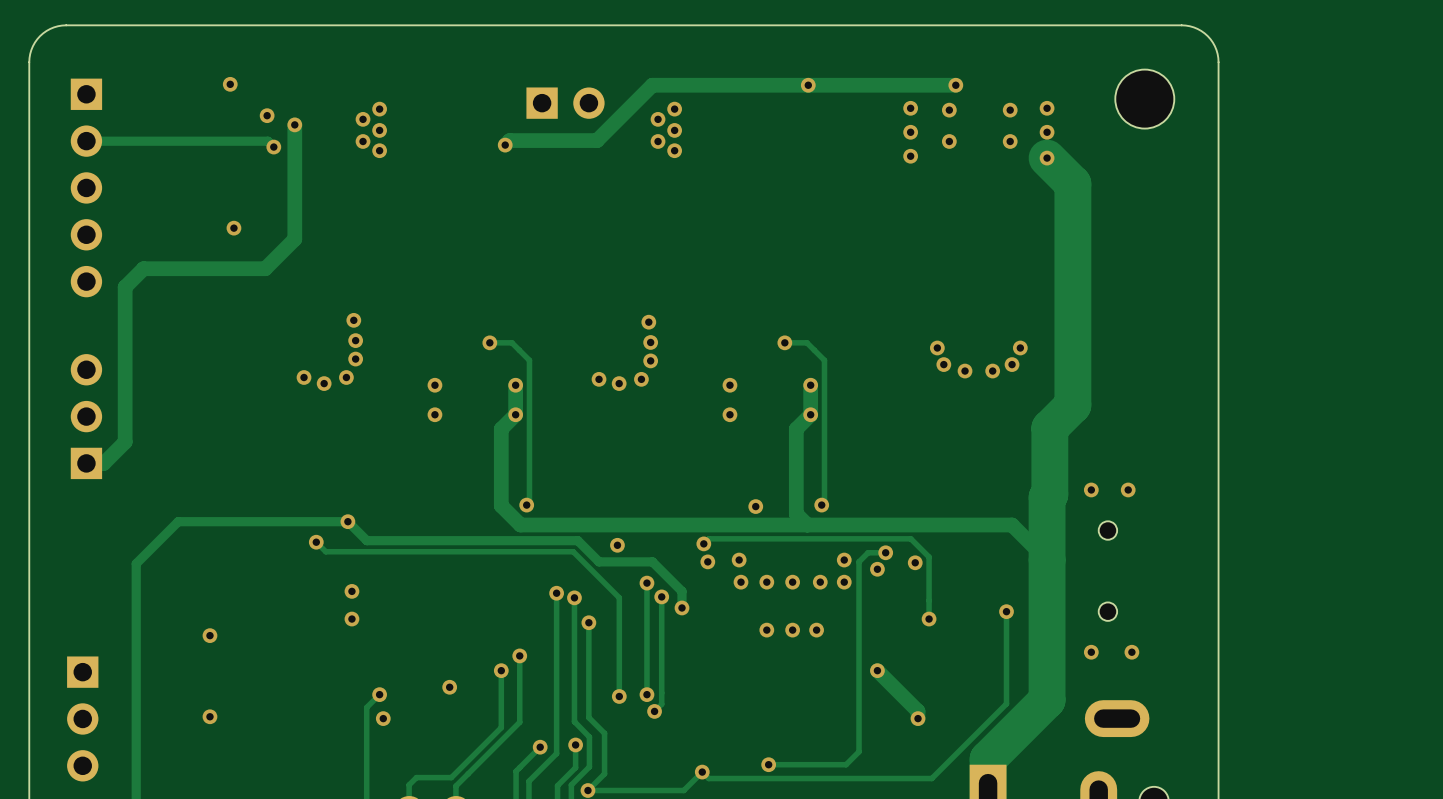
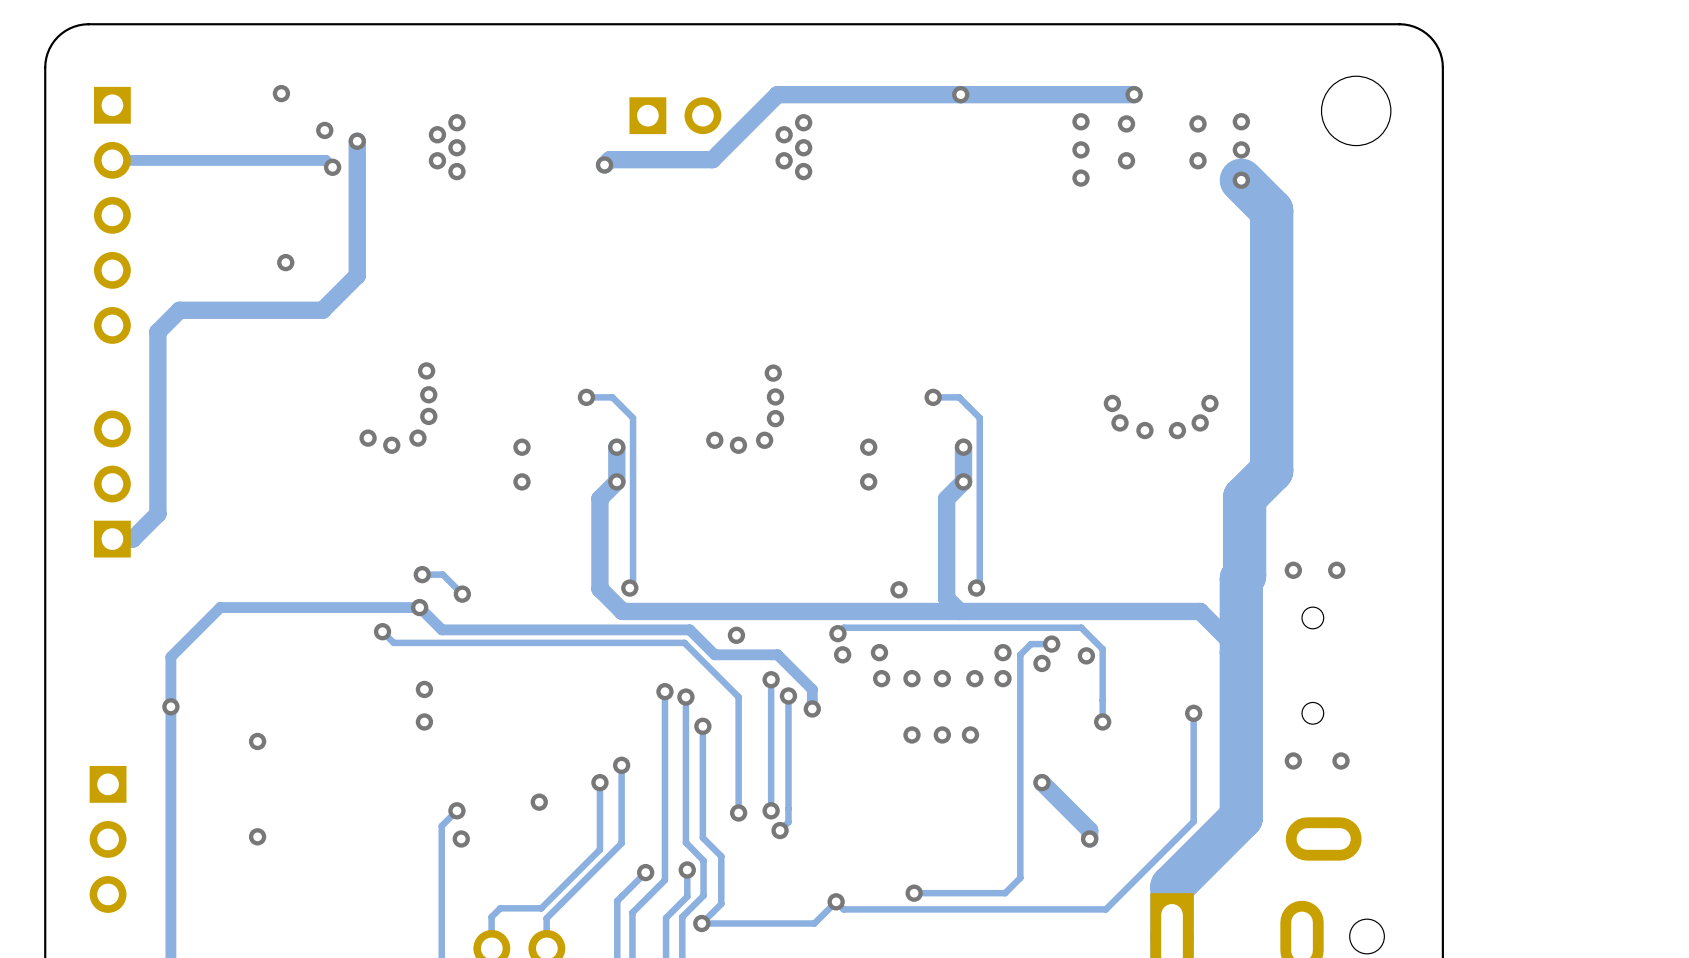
track: none -> (422, 574) (442, 574) (462, 594)
via: none -> (422, 574)
via: none -> (462, 594)
via: none -> (170, 706)

